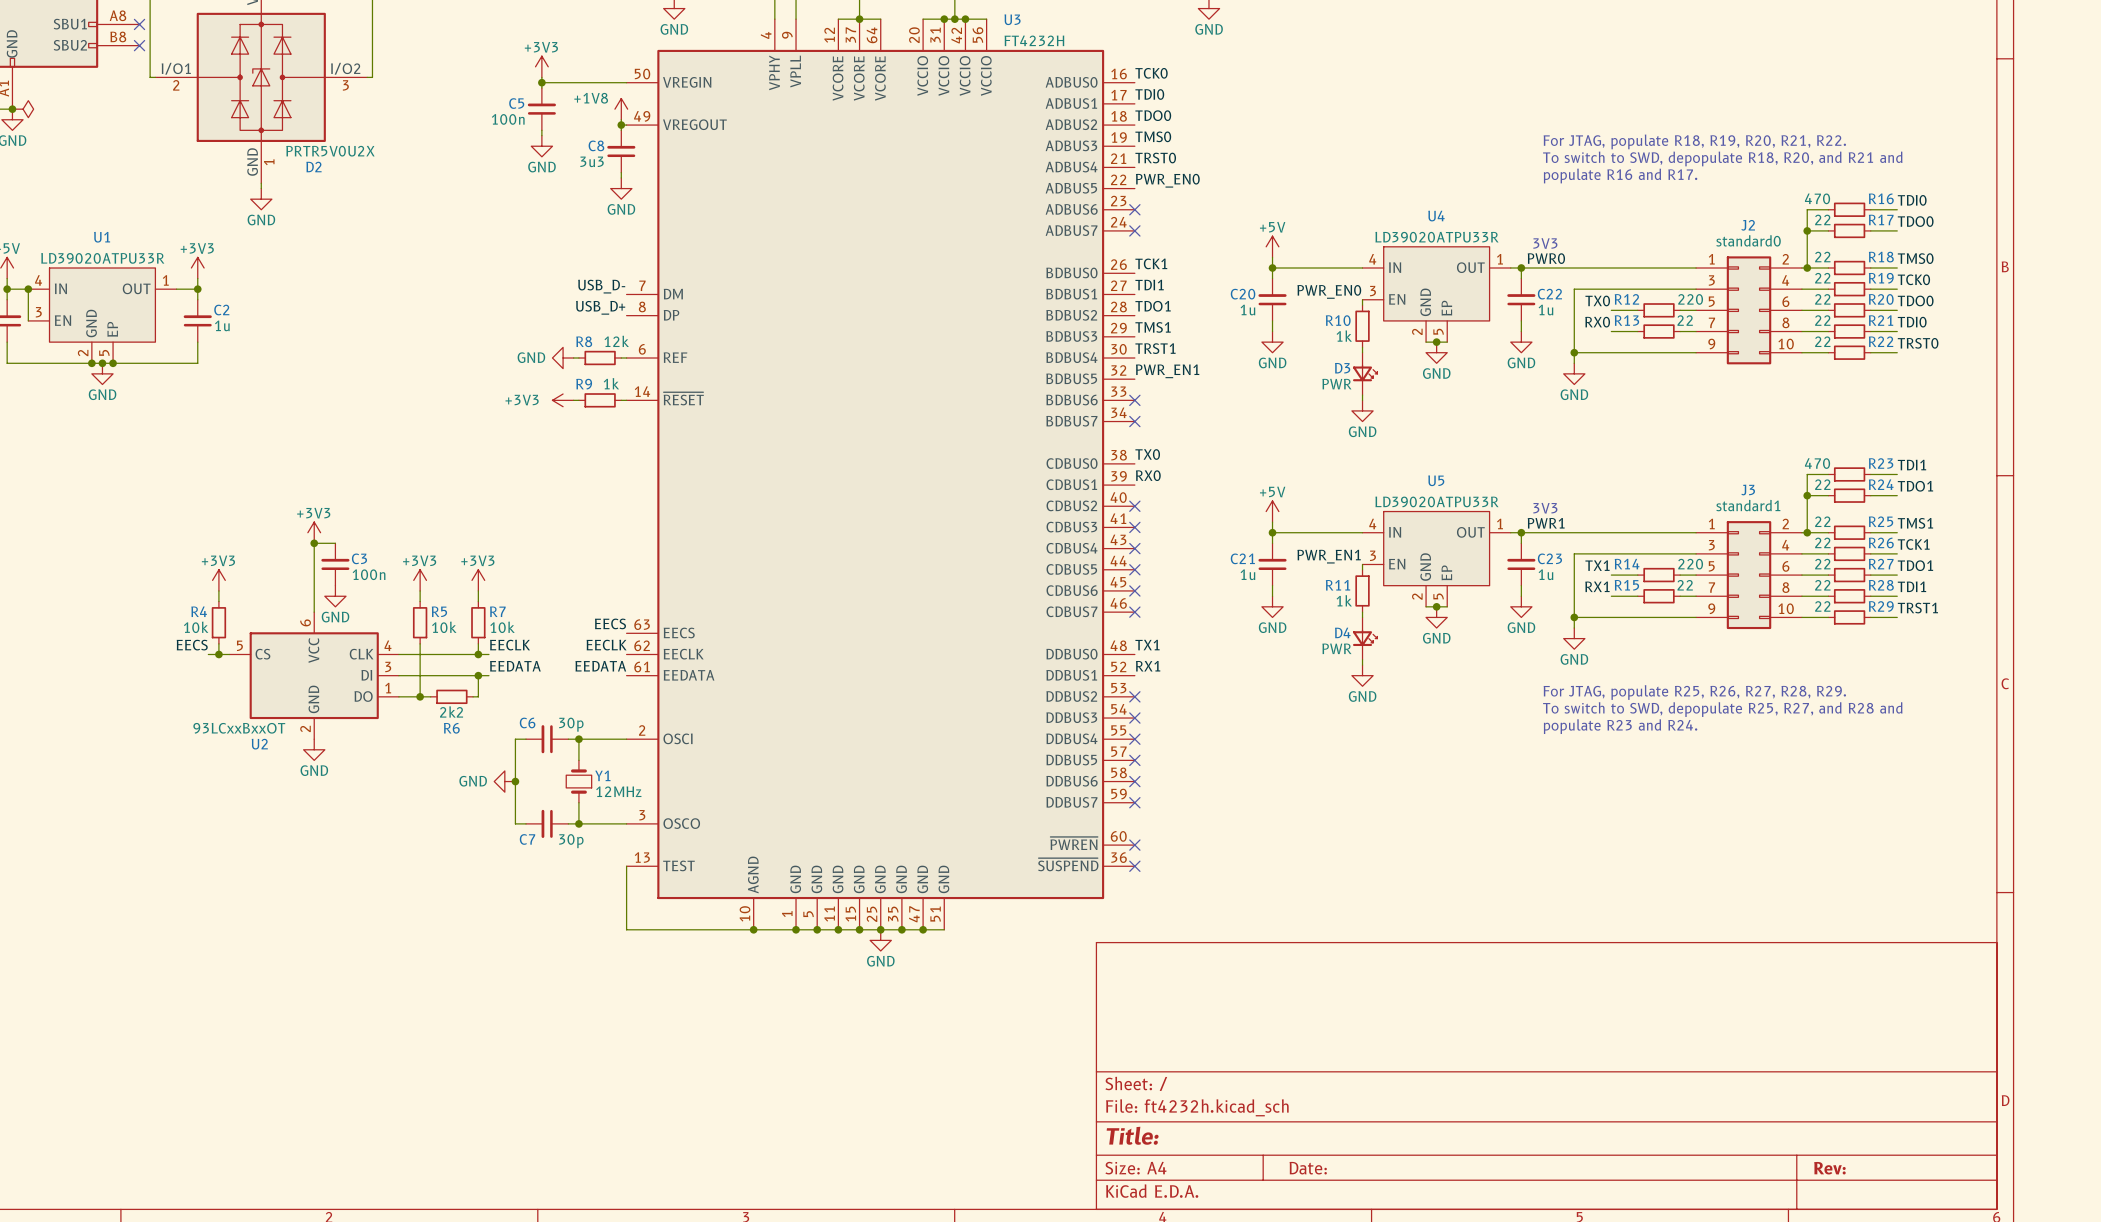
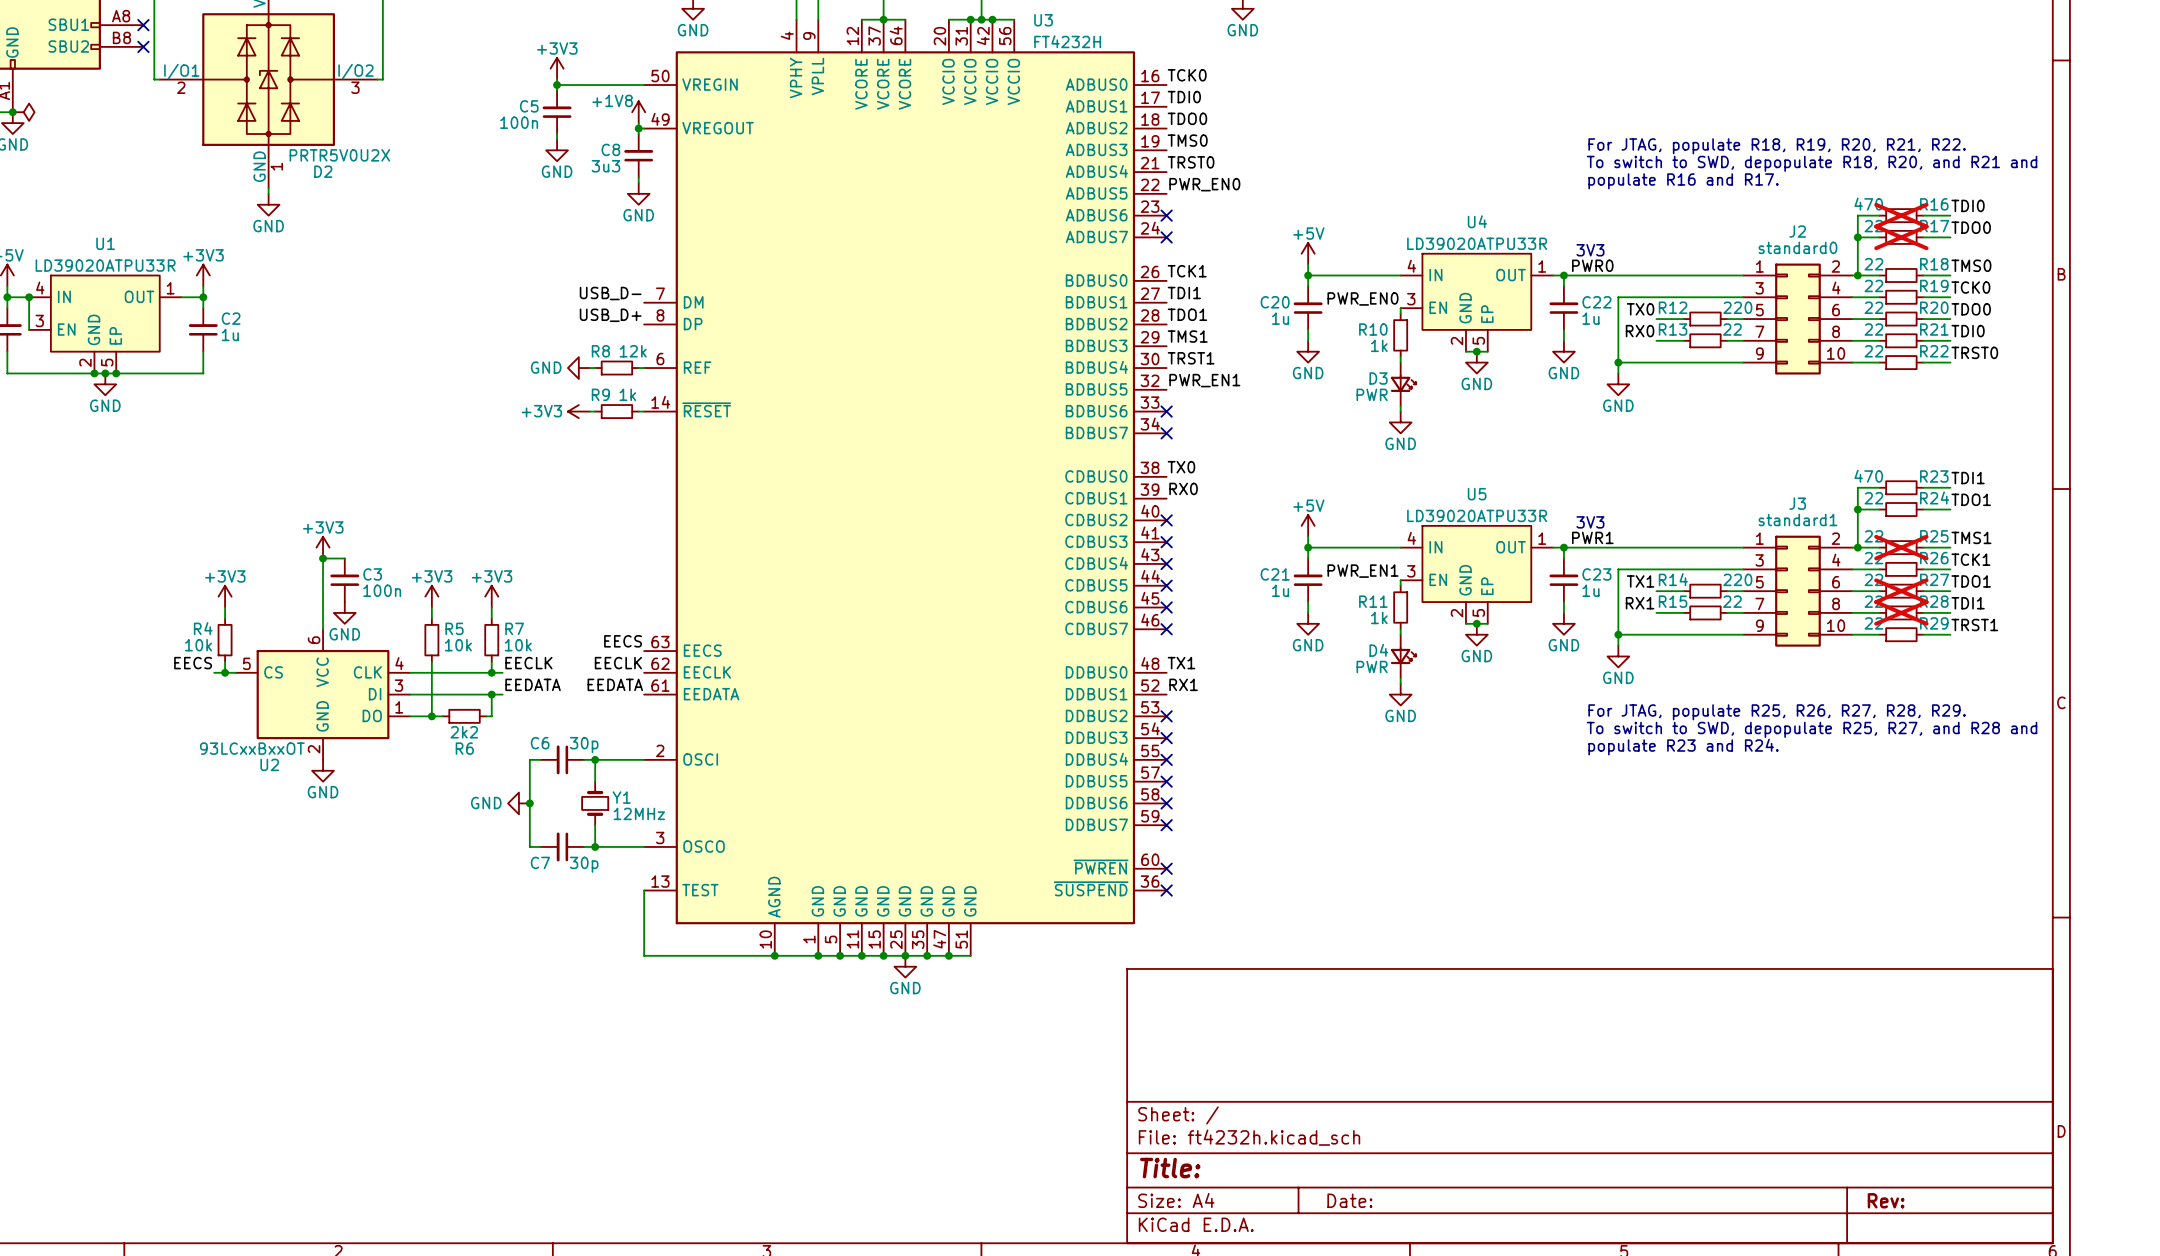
R16 do-not-place cross: none -> (1901, 215)
R17 do-not-place cross: none -> (1901, 237)
R25 do-not-place cross: none -> (1901, 547)
R27 do-not-place cross: none -> (1901, 591)
R28 do-not-place cross: none -> (1901, 612)

